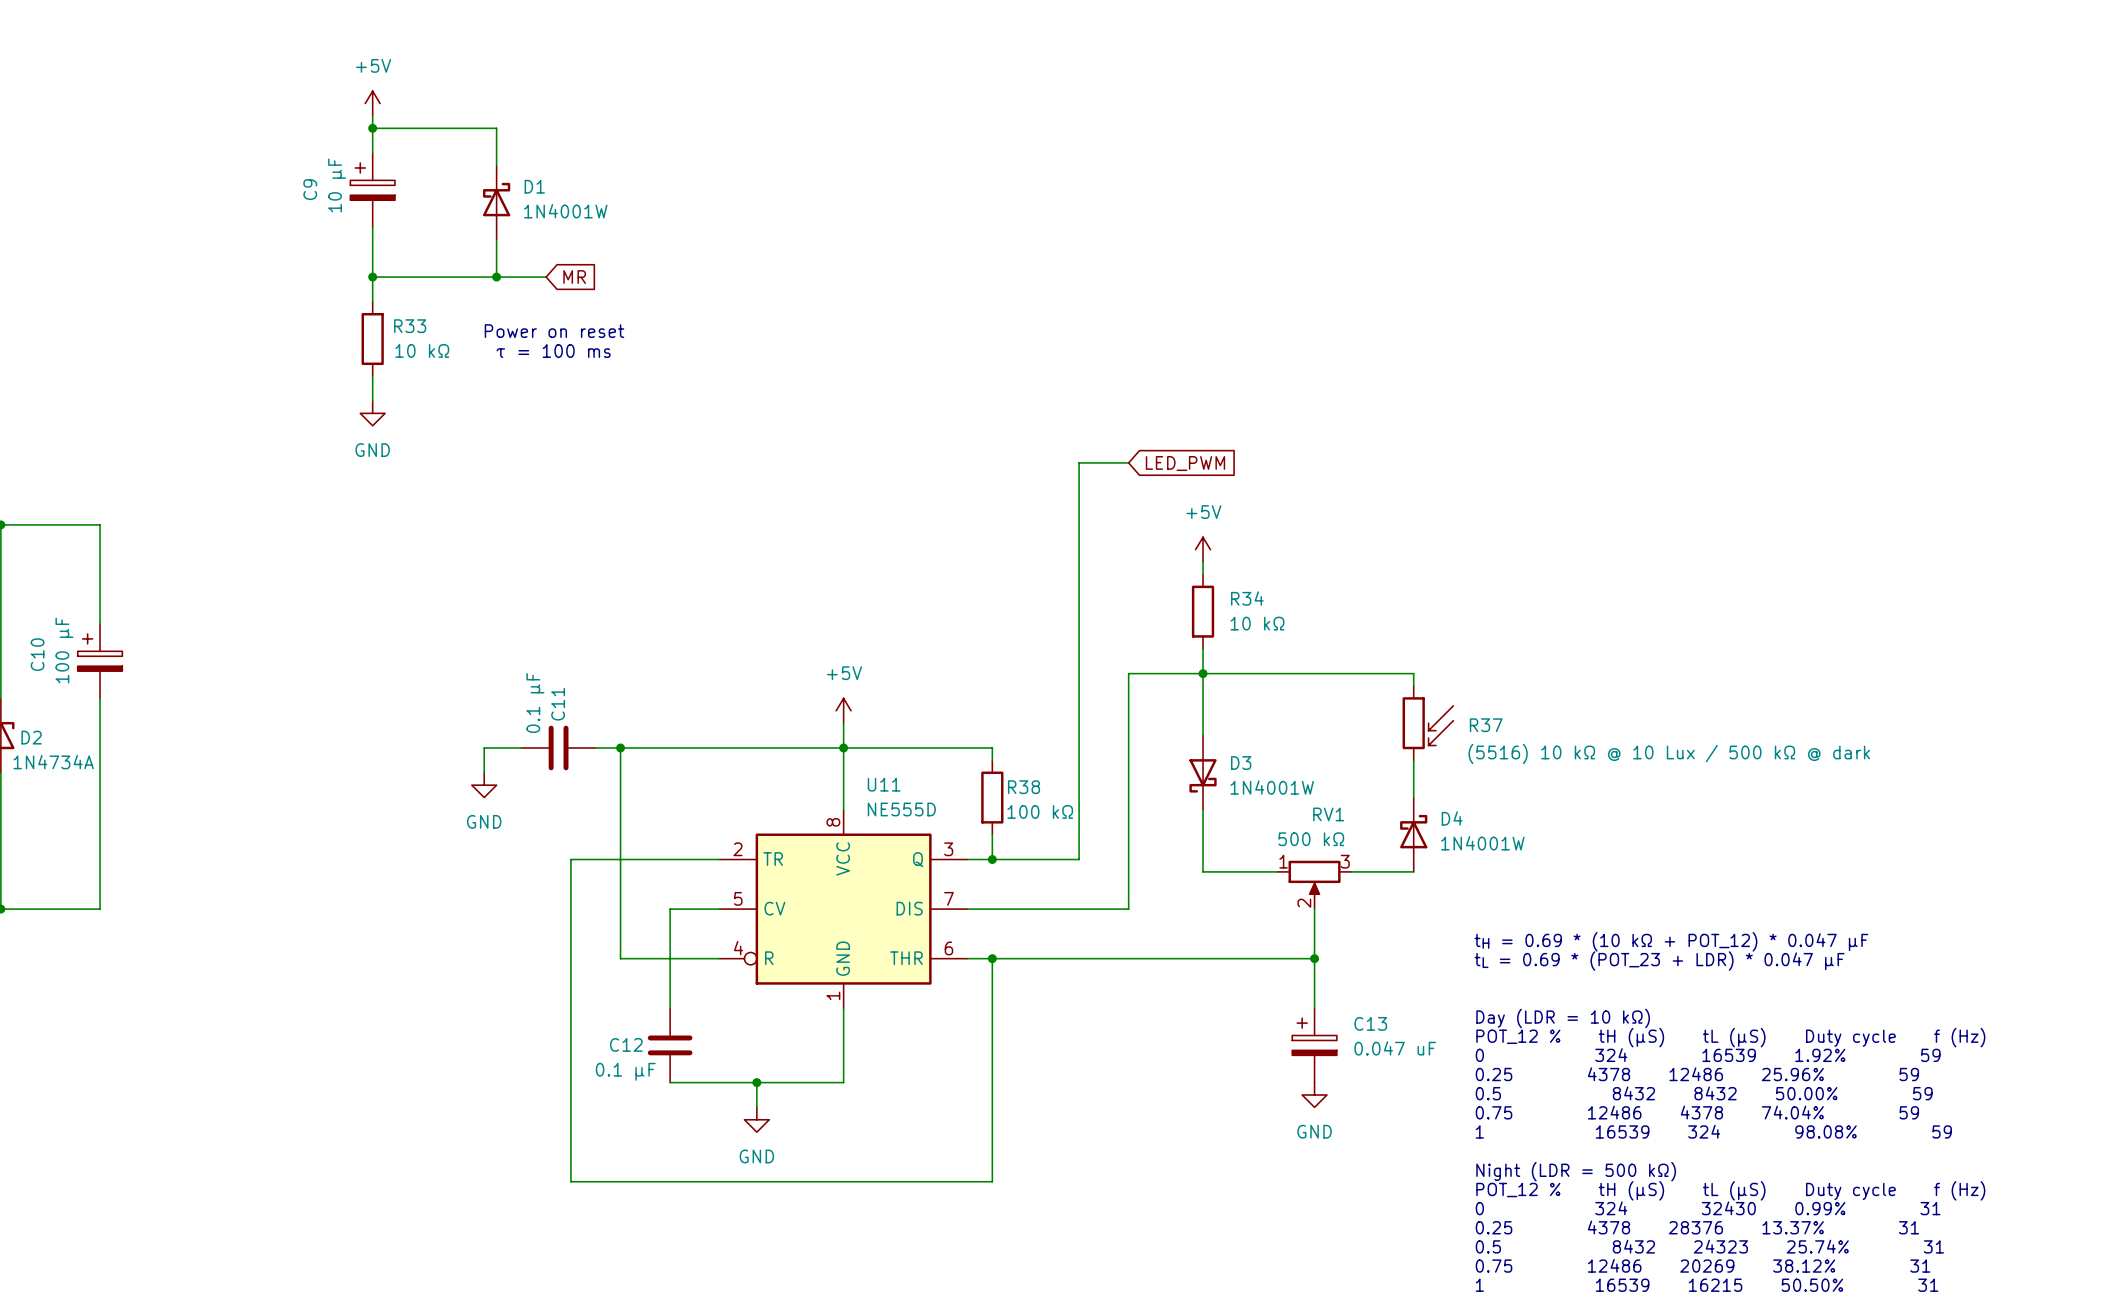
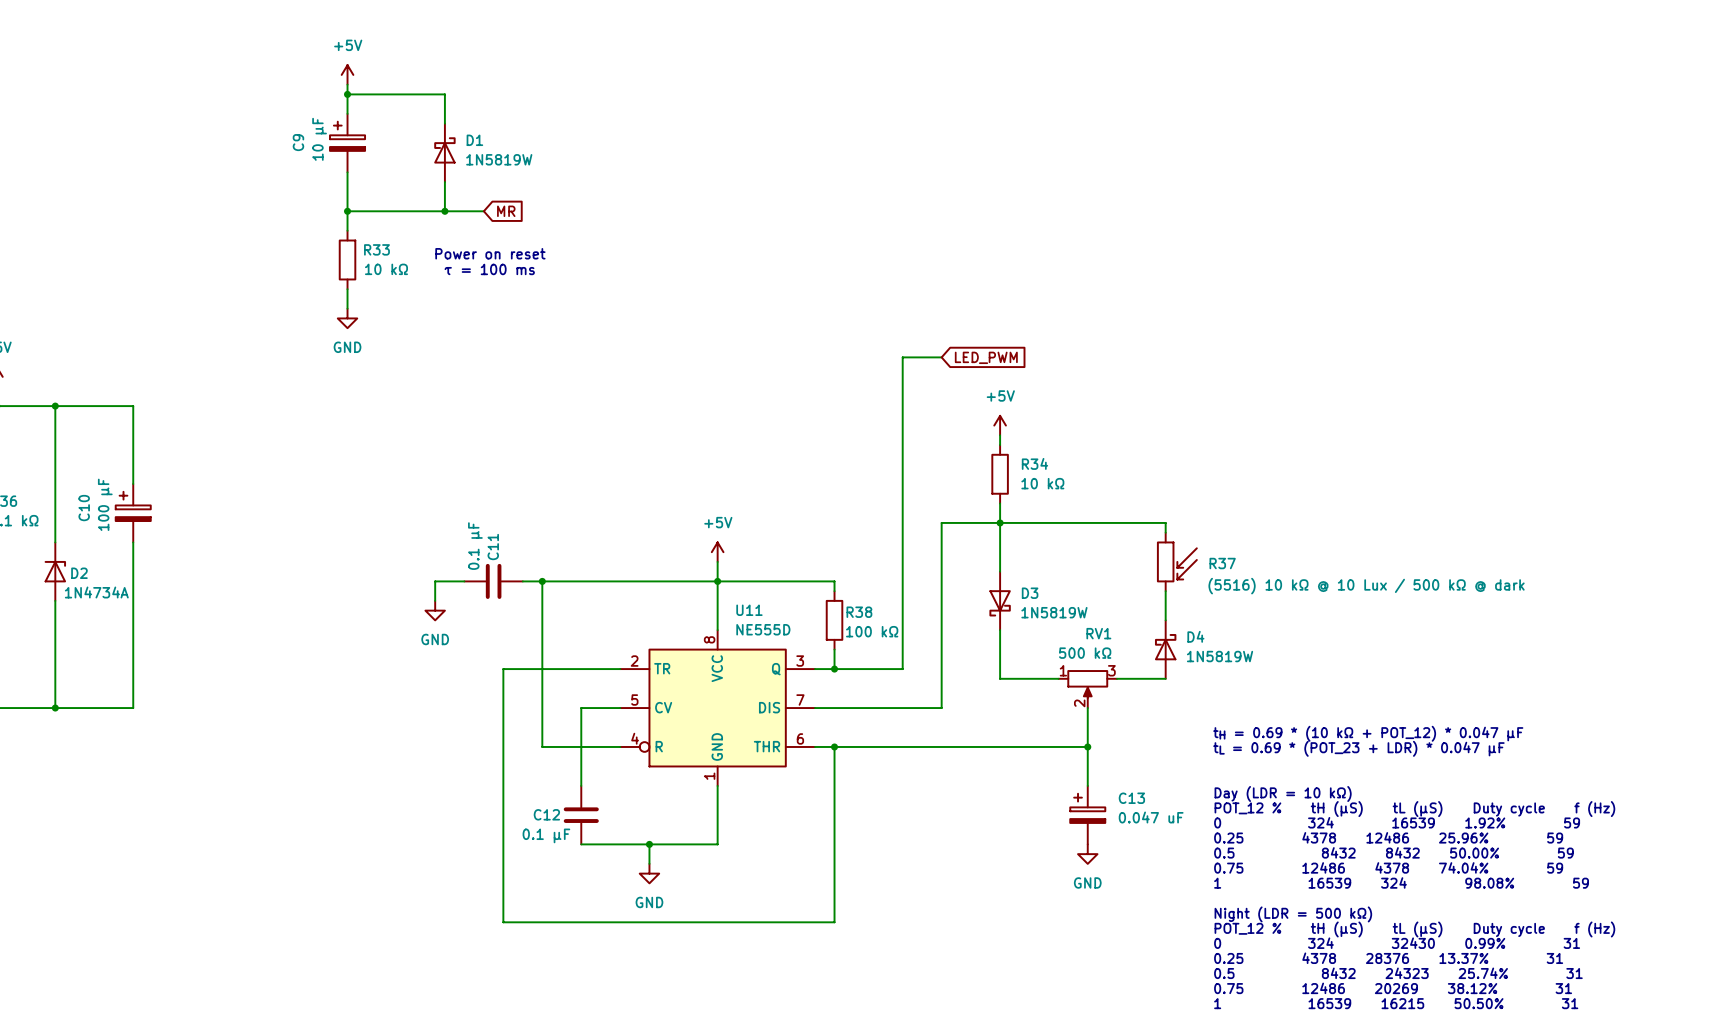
D1 value: 1N4001W (565, 211) -> 1N5819W (499, 159)
D3 value: 1N4001W (1272, 787) -> 1N5819W (1054, 612)
D4 value: 1N4001W (1482, 843) -> 1N5819W (1220, 656)

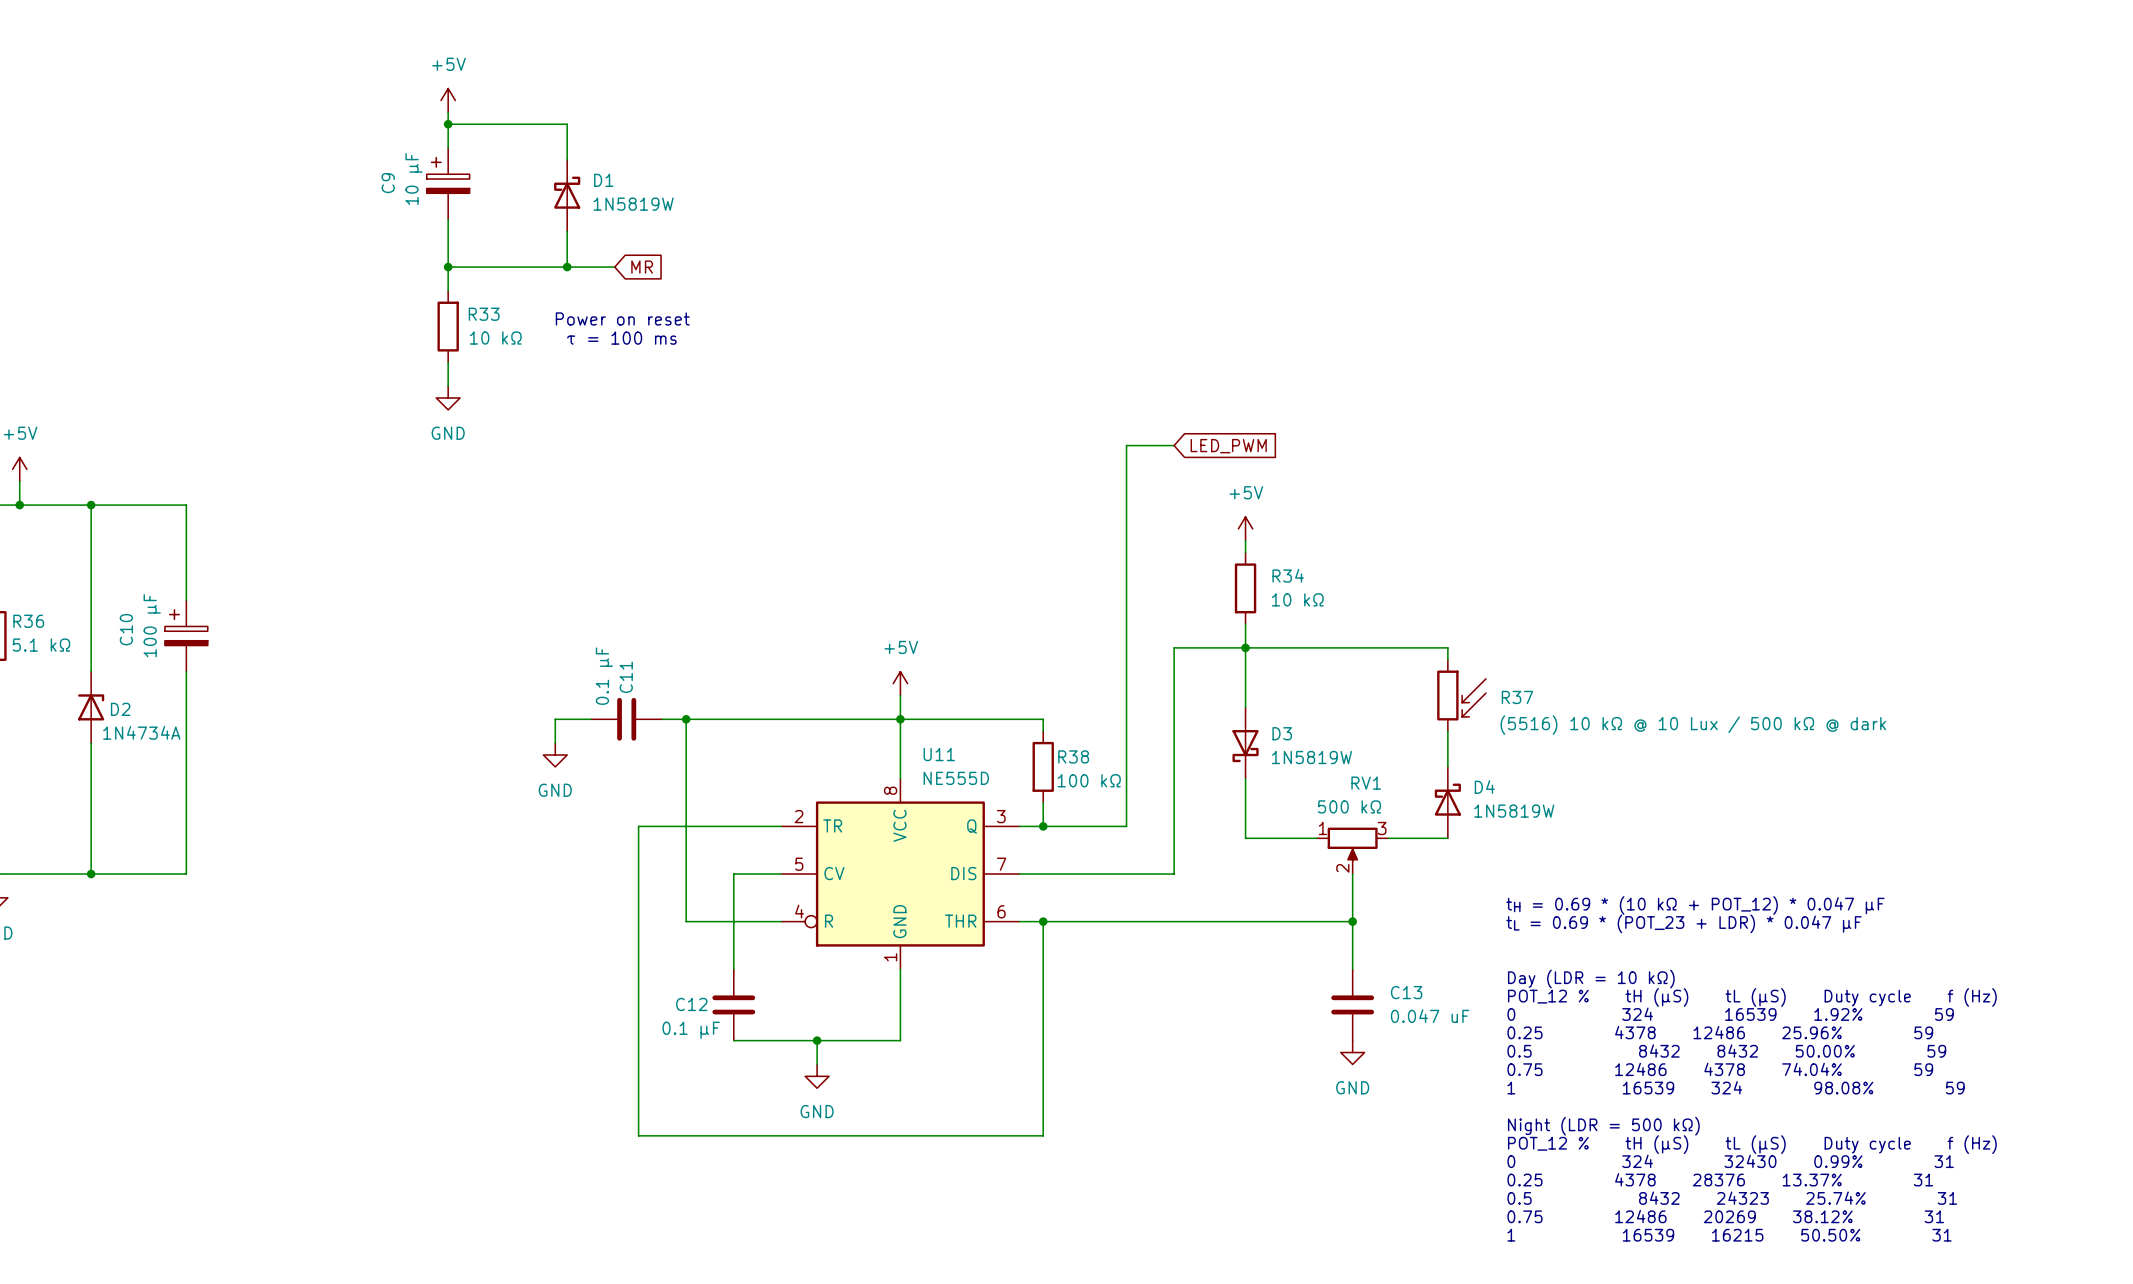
C13 symbol: [1070, 785, 1106, 845] -> [1331, 969, 1375, 1041]

